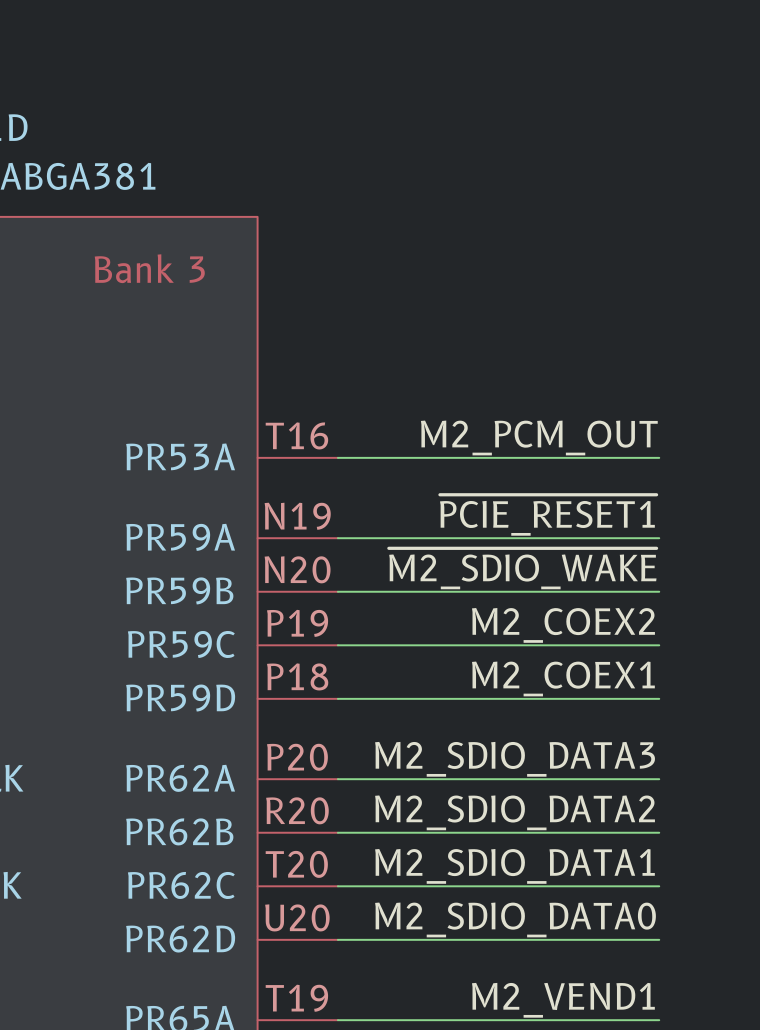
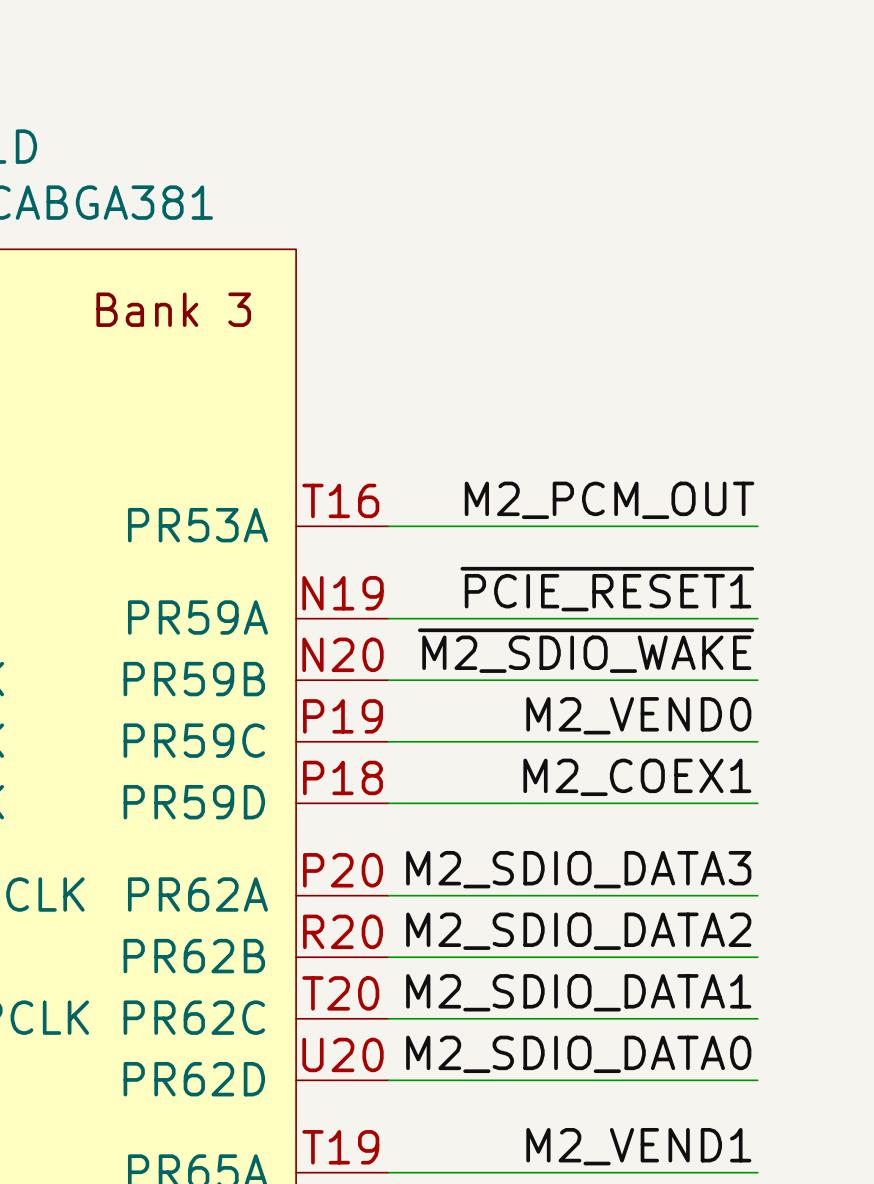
label: M2_COEX2 (563, 625) -> M2_VEND0 (638, 715)

